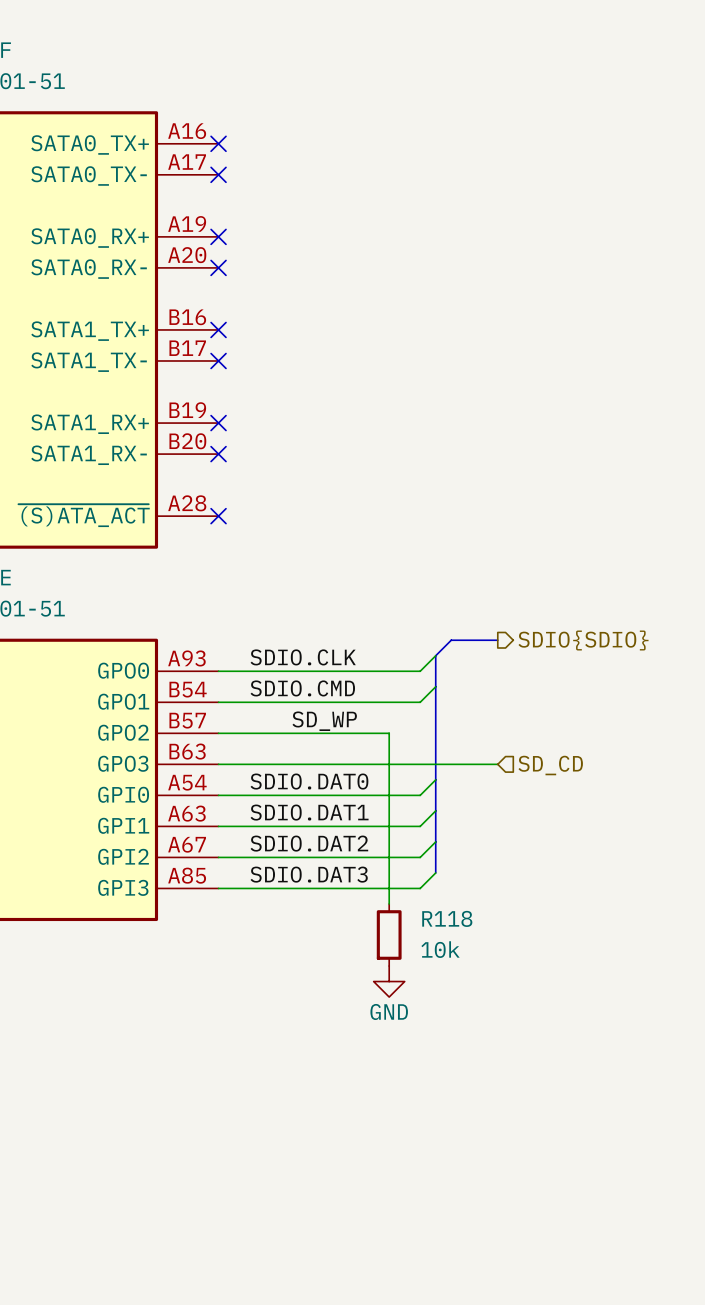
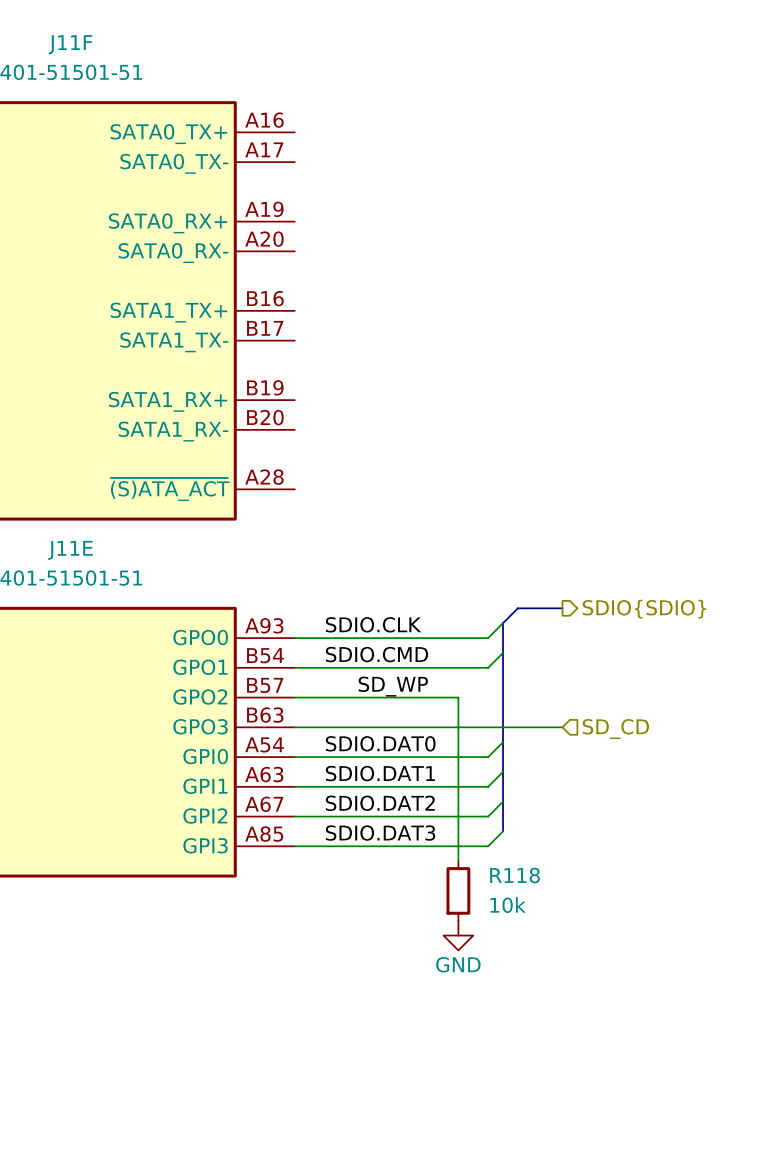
no-connect mark: (218, 143) -> none
no-connect mark: (218, 174) -> none
no-connect mark: (218, 236) -> none
no-connect mark: (218, 267) -> none
no-connect mark: (218, 329) -> none
no-connect mark: (218, 360) -> none
no-connect mark: (218, 423) -> none
no-connect mark: (218, 454) -> none
no-connect mark: (218, 516) -> none

